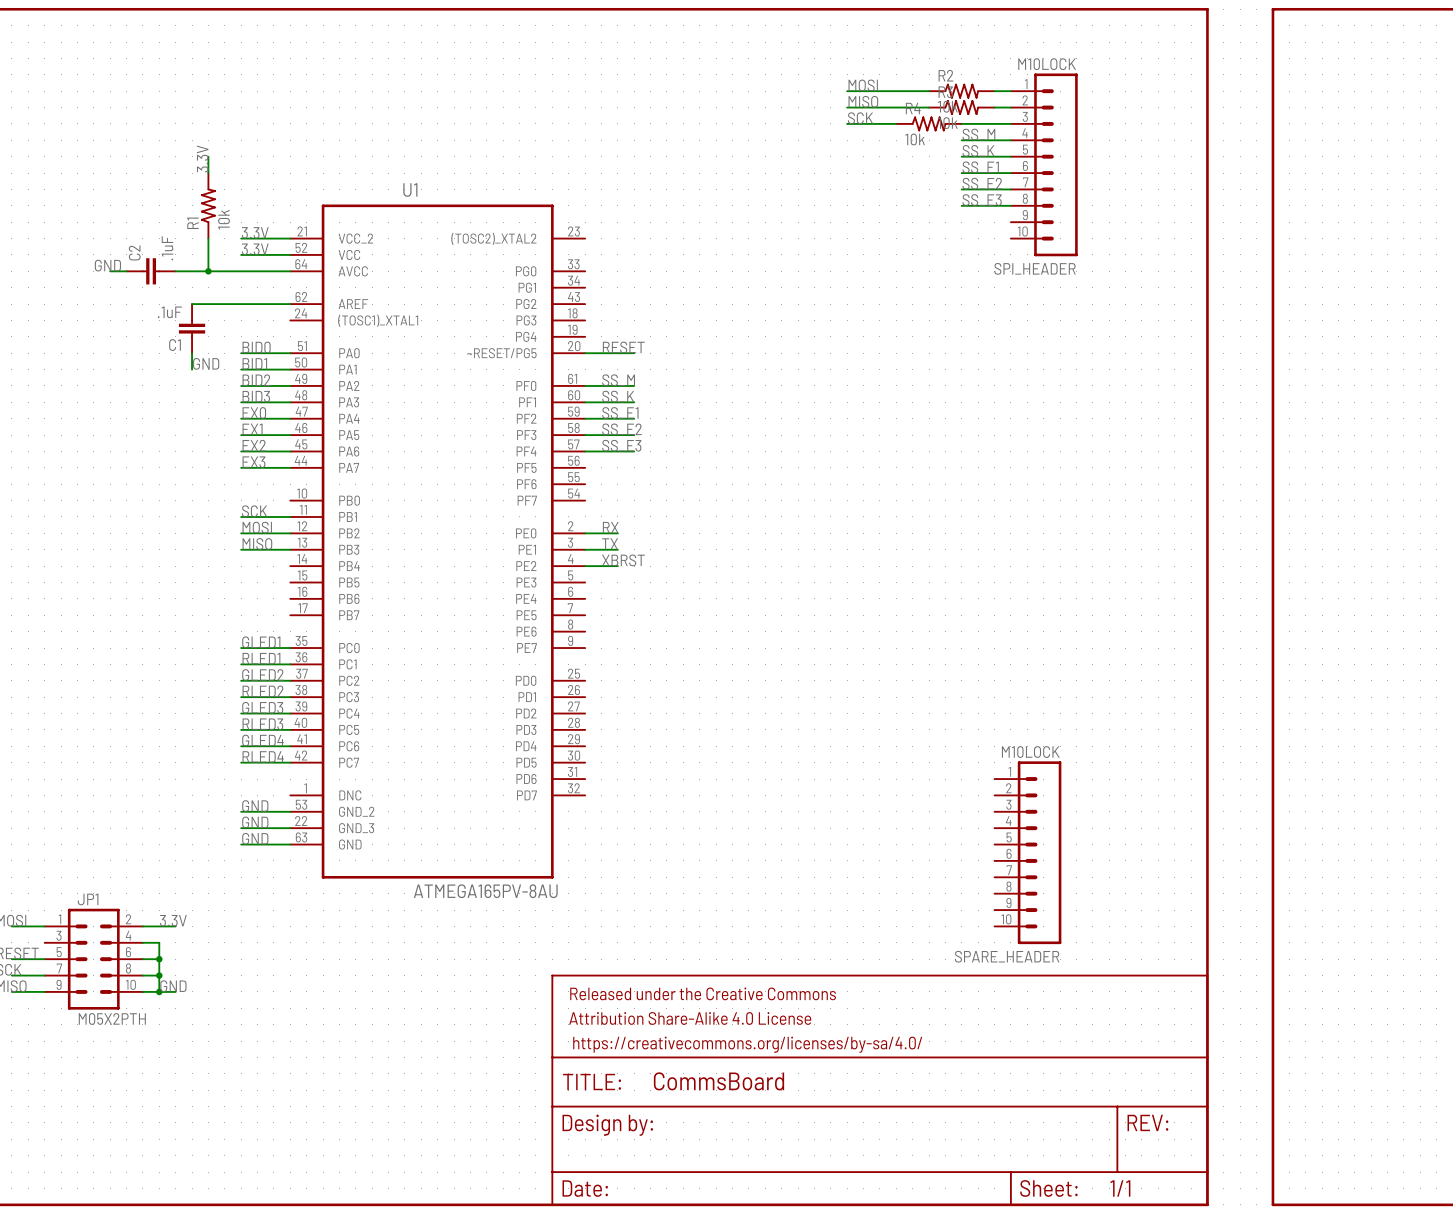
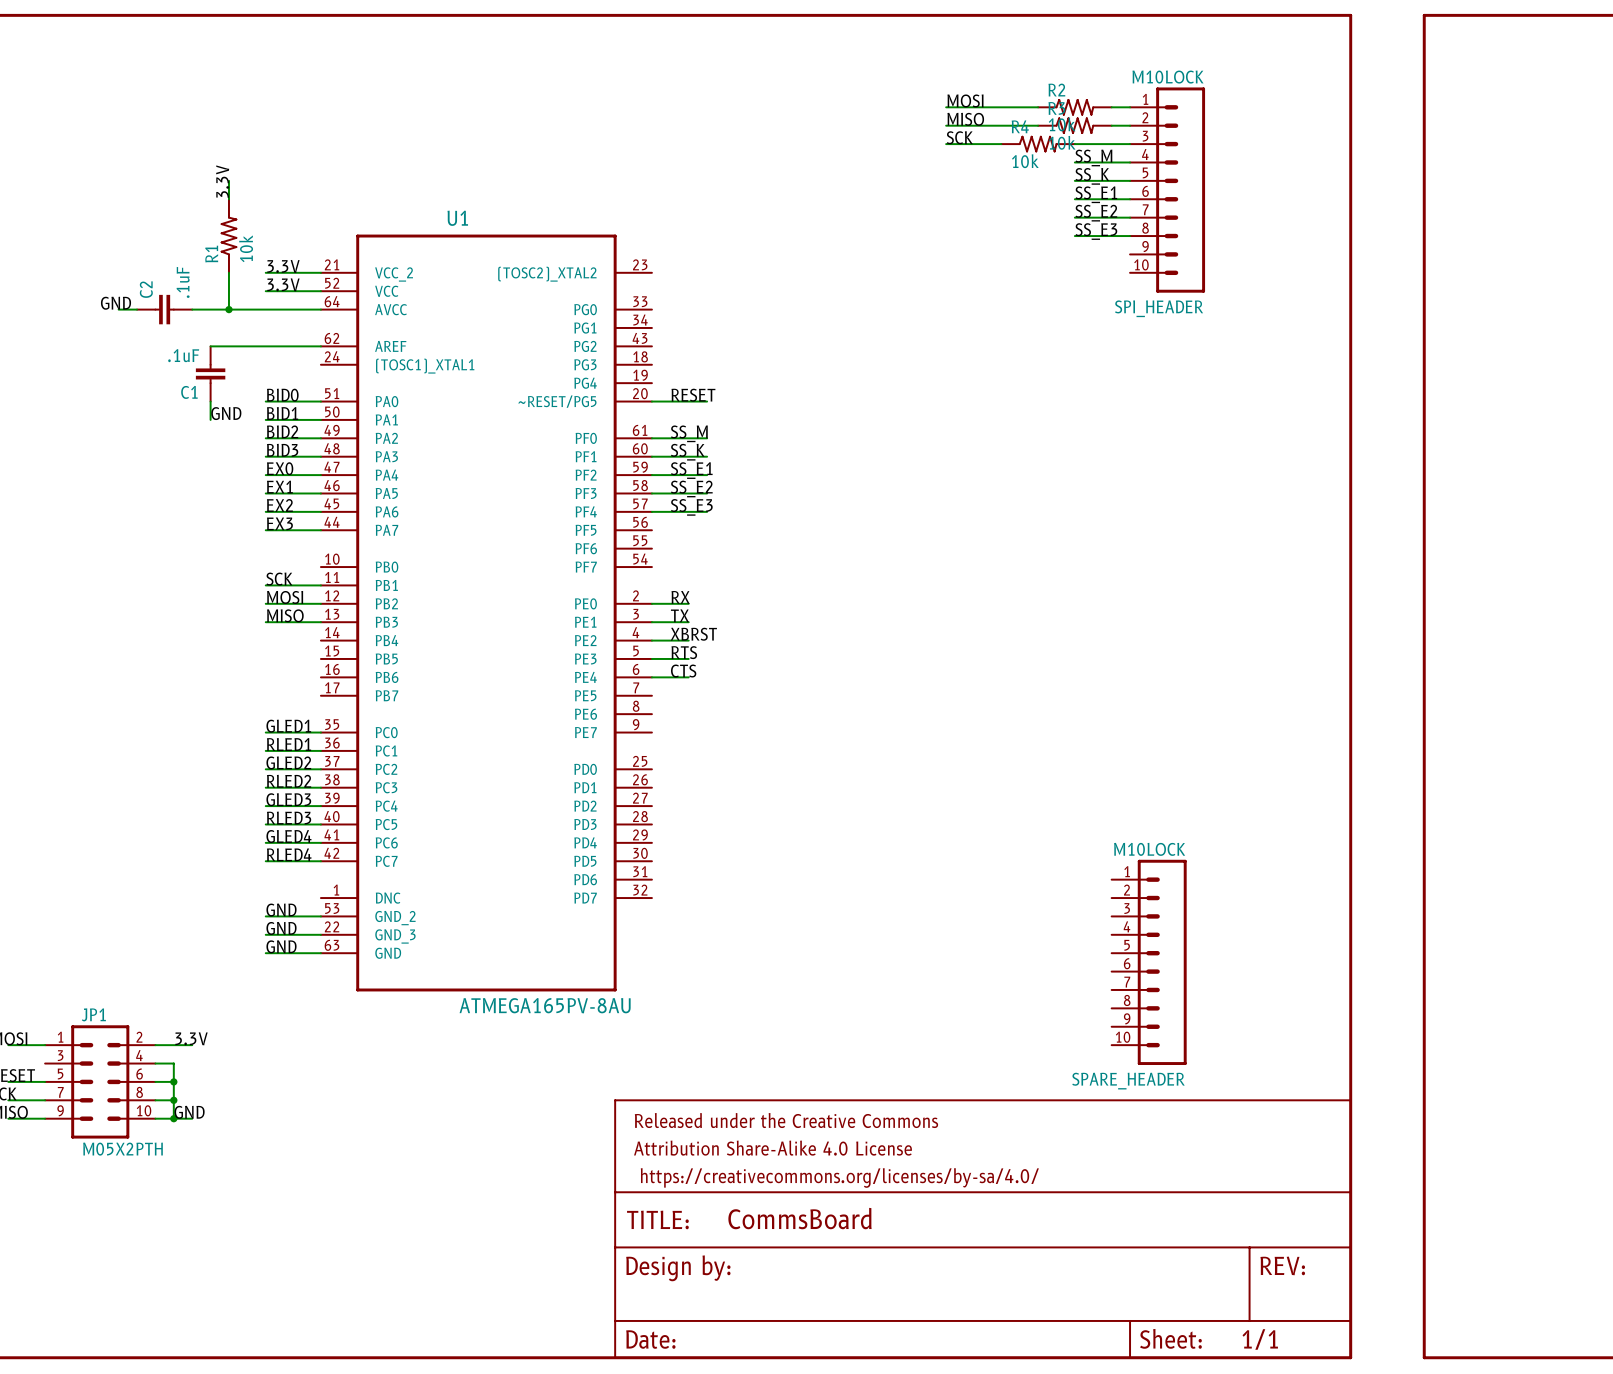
label: none -> RTS (684, 652)
wire: none -> (651, 658) (688, 658)
label: none -> CTS (683, 671)
wire: none -> (651, 677) (688, 677)

